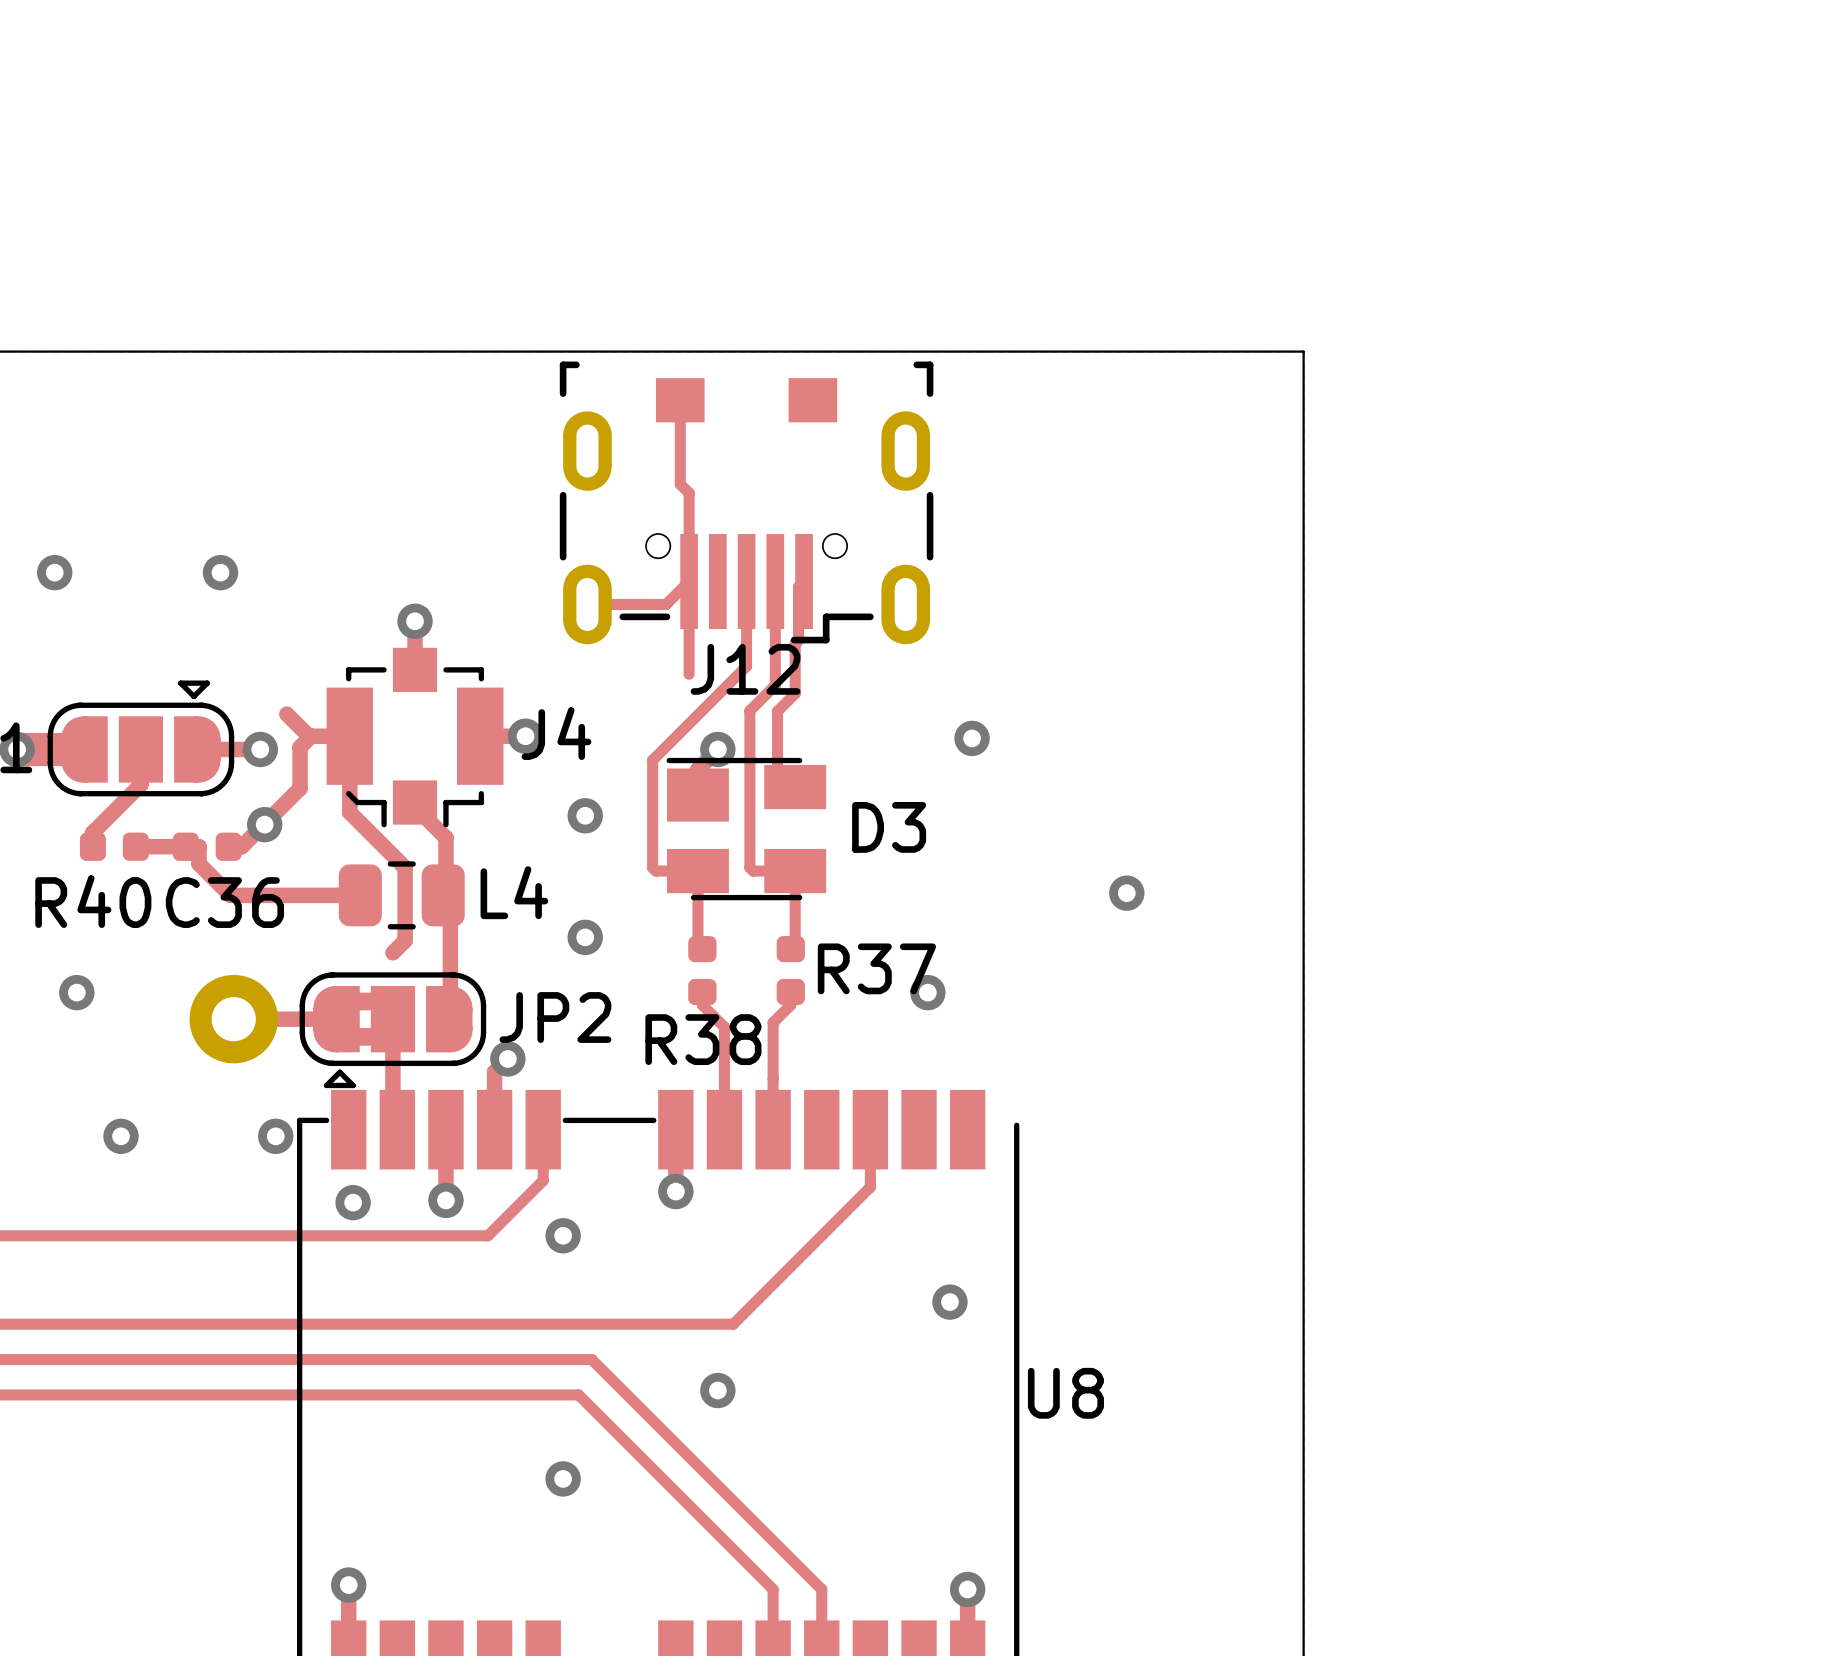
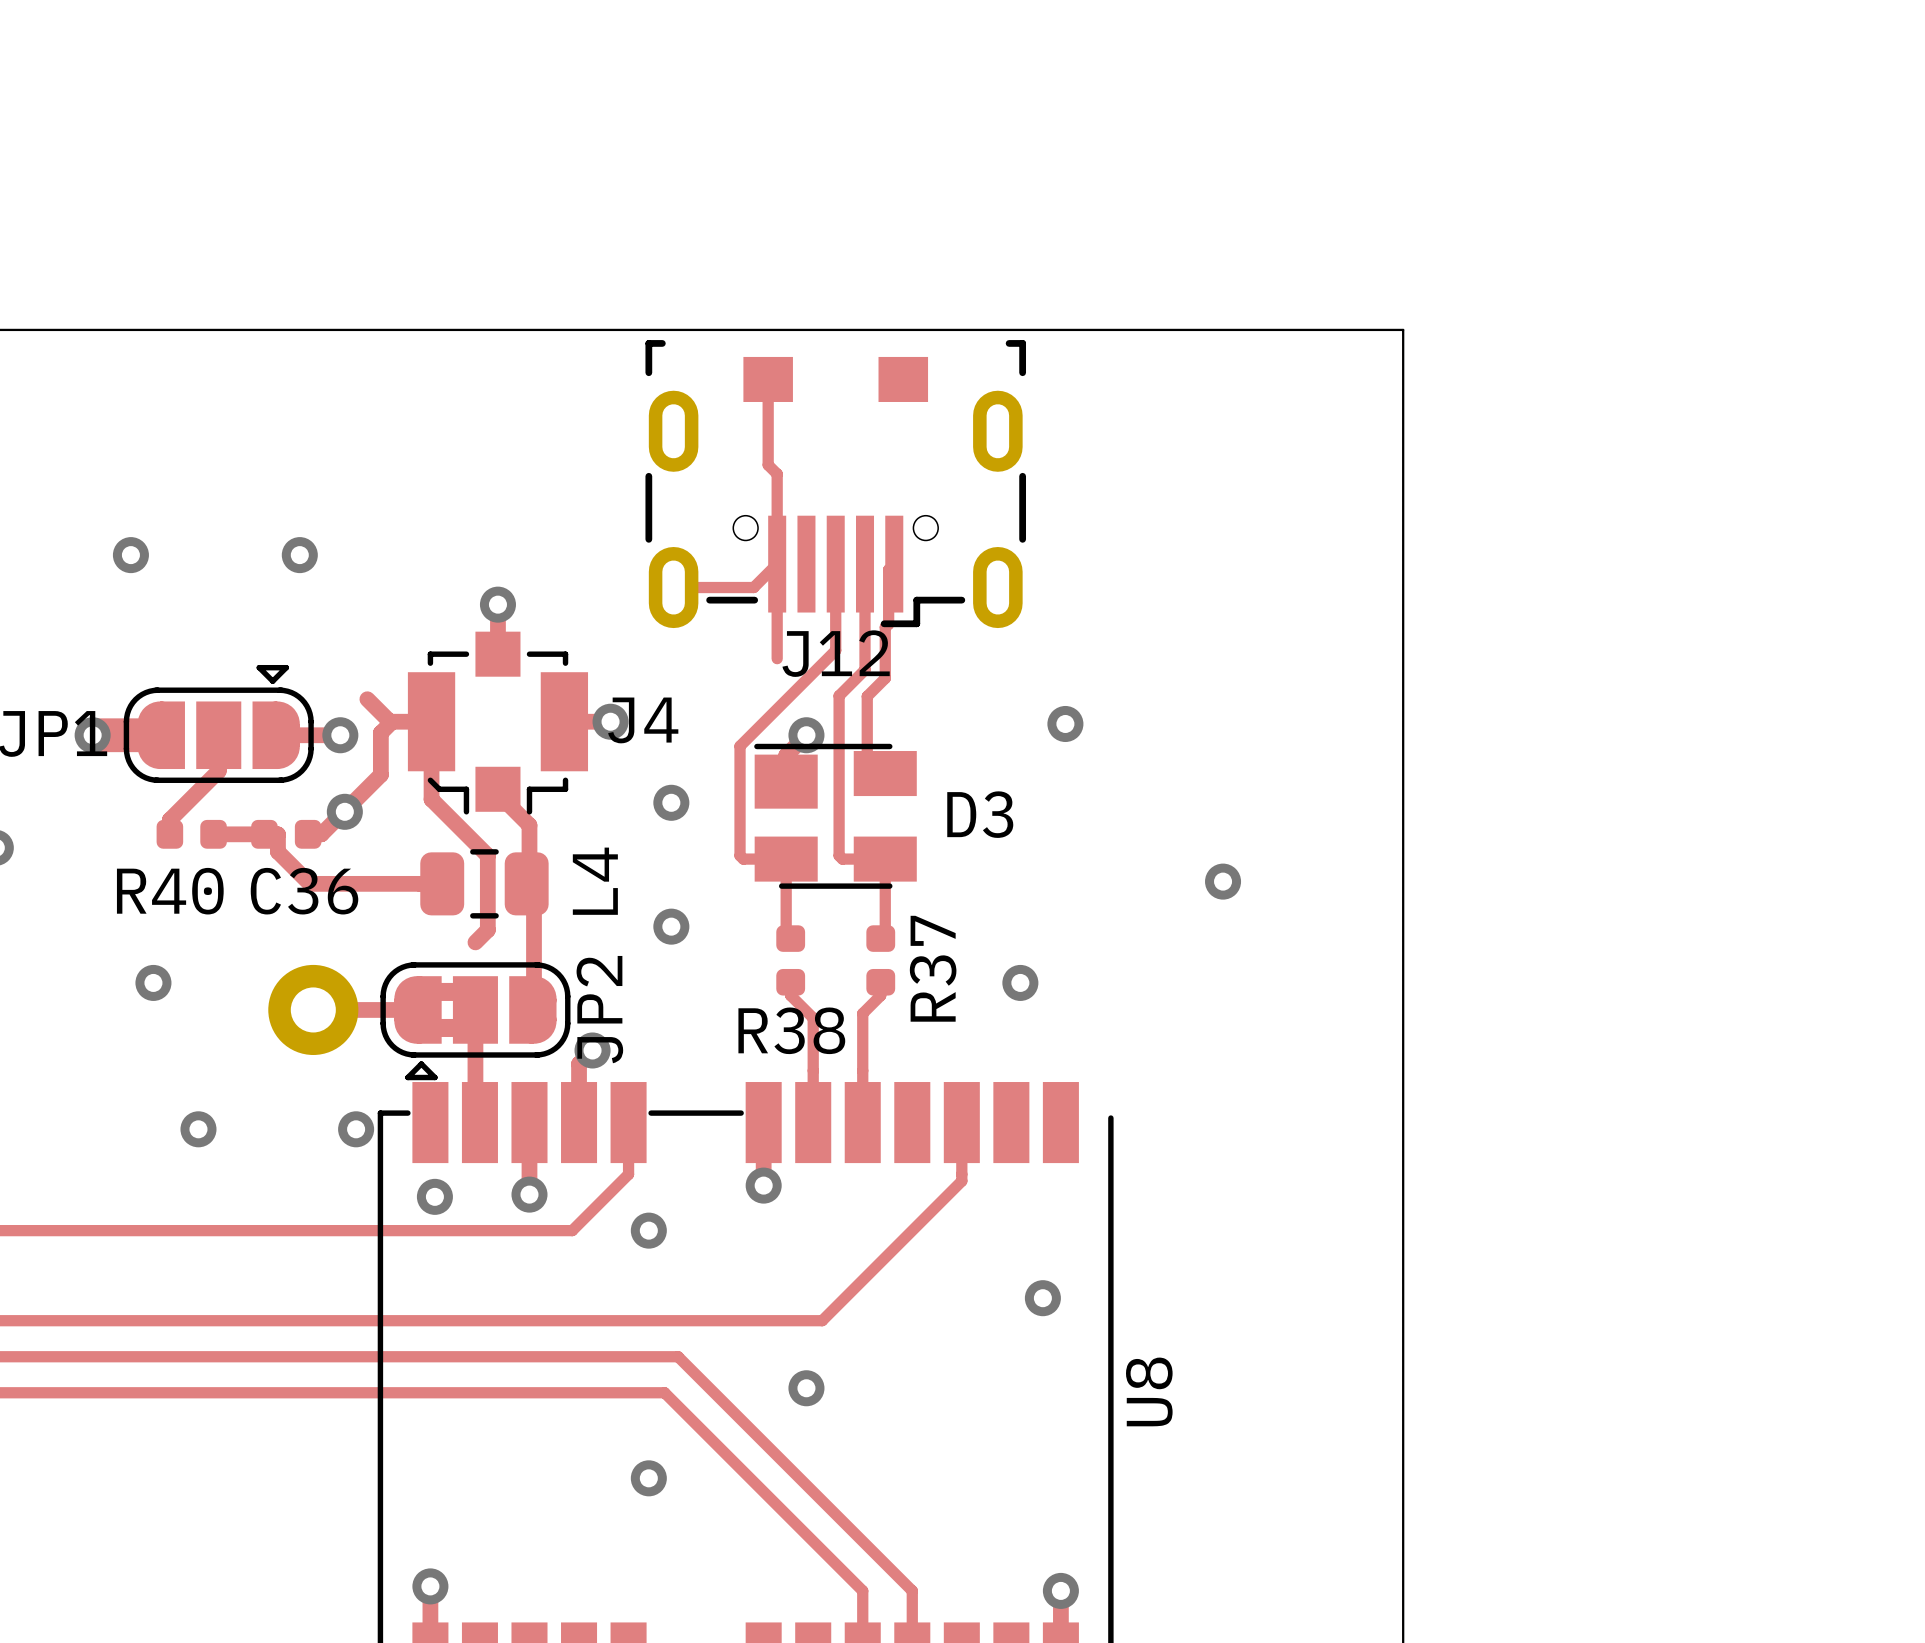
L4 name rotation: 0° (514, 892) -> 90° counterclockwise (595, 881)
R37 name rotation: 0° (876, 968) -> 90° counterclockwise (933, 968)
JP2 name rotation: 0° (555, 1017) -> 90° counterclockwise (599, 1009)
U8 name rotation: 0° (1065, 1393) -> 90° counterclockwise (1149, 1391)

